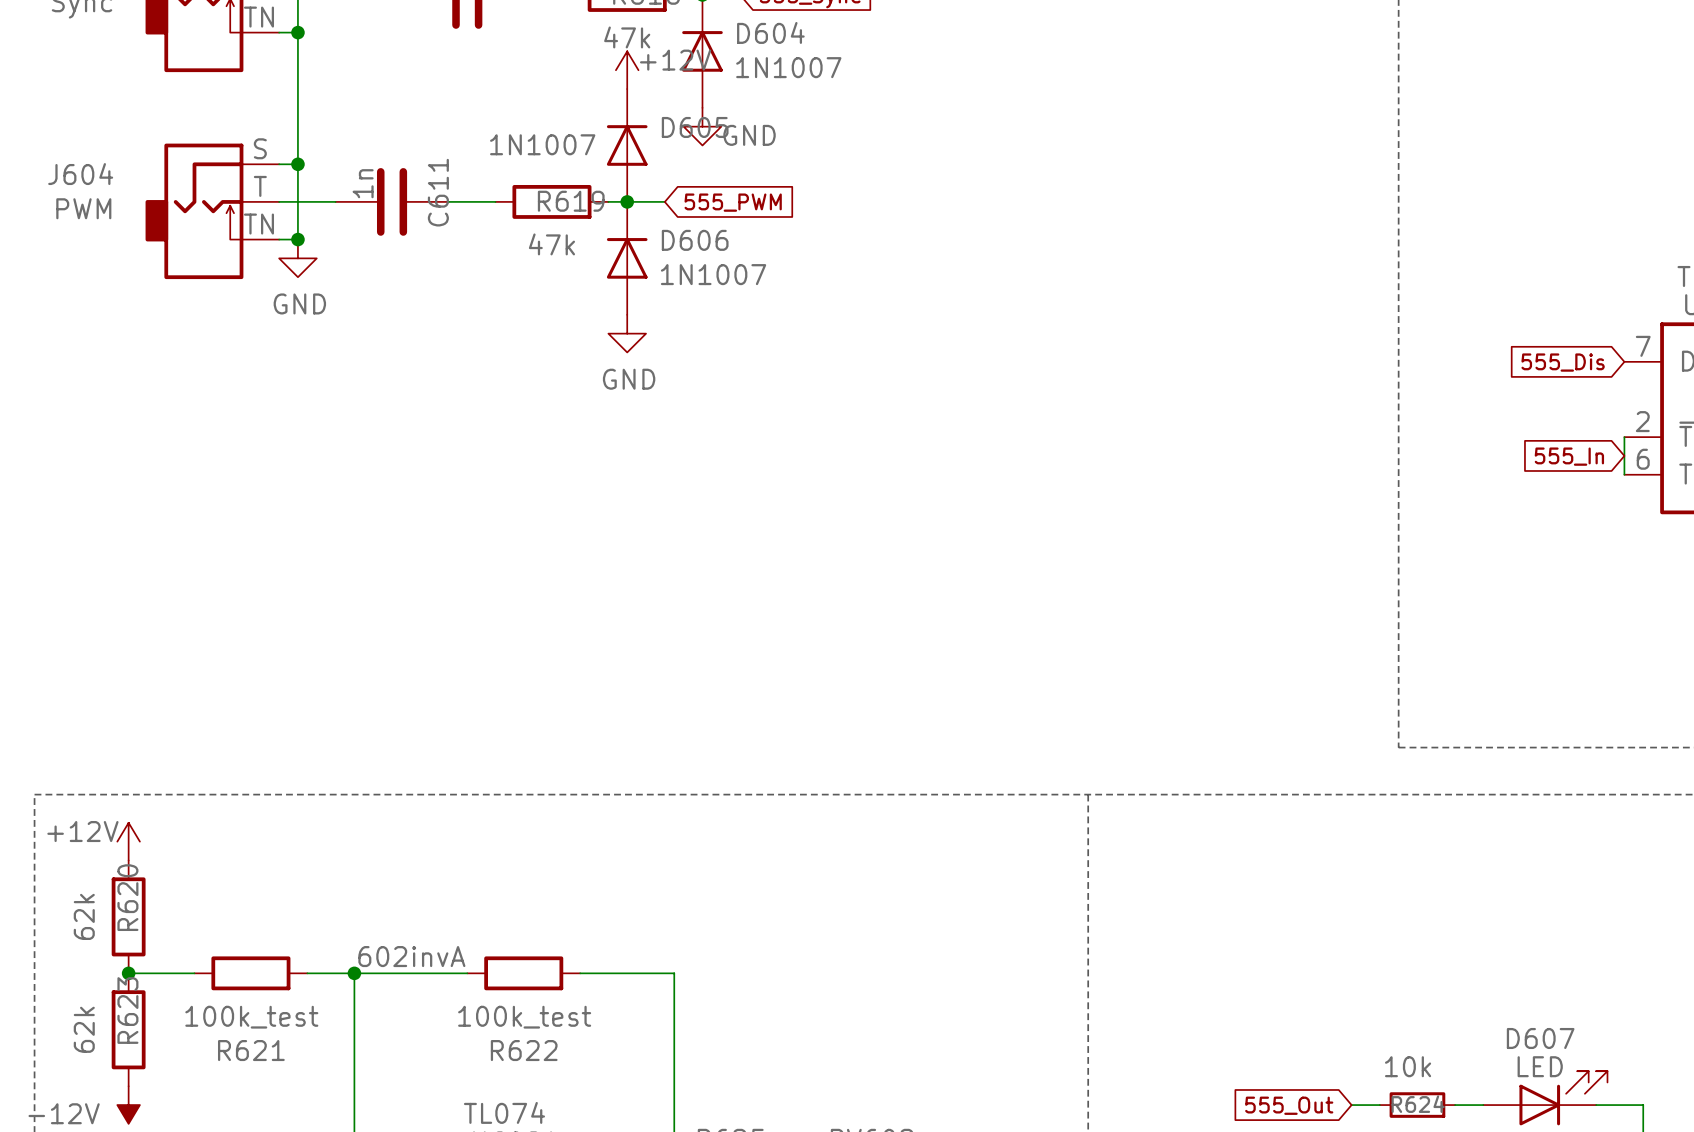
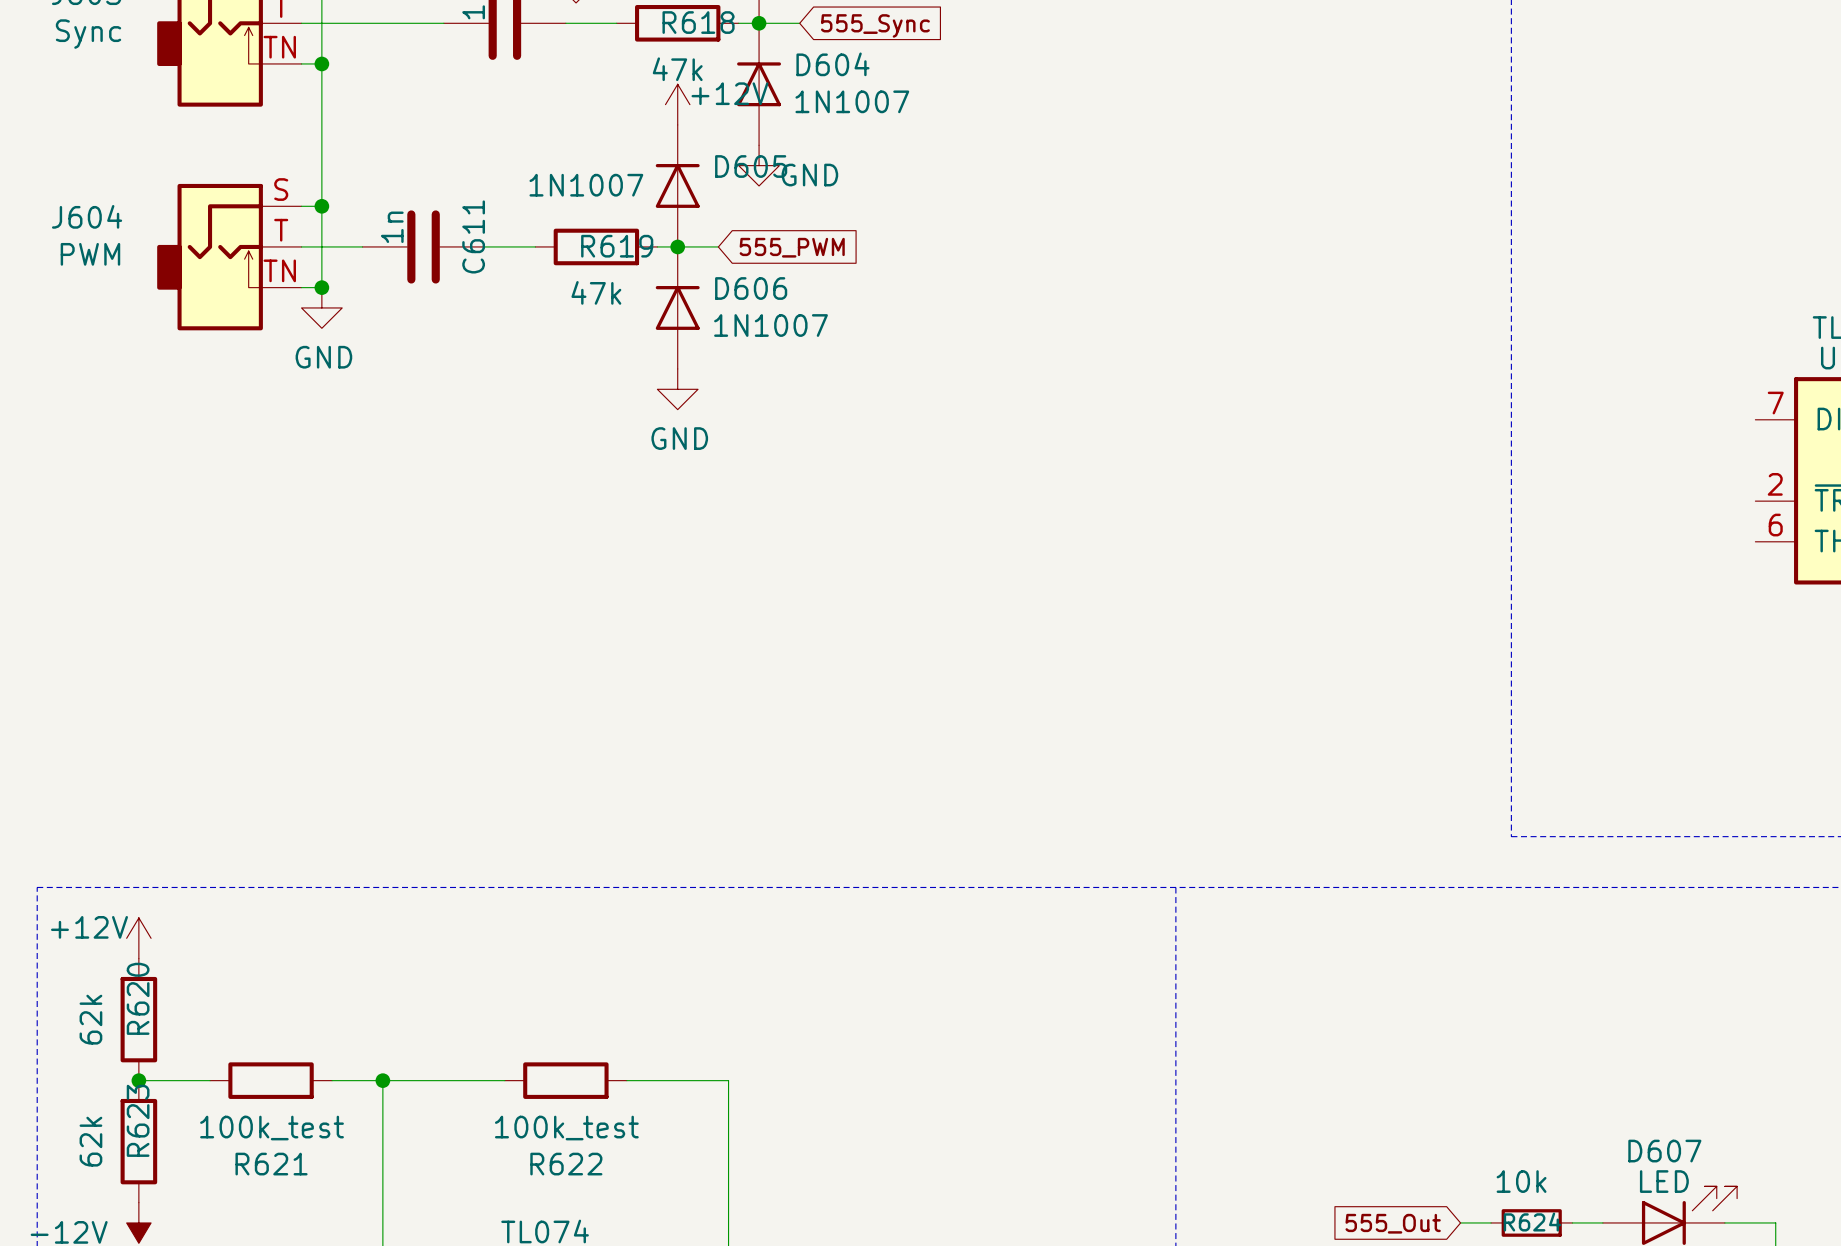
global label: 555_Dis (1563, 362) -> none
wire: (1624, 437) (1624, 474) -> none
global label: 555_In (1569, 456) -> none
label: 602invA (411, 956) -> none

